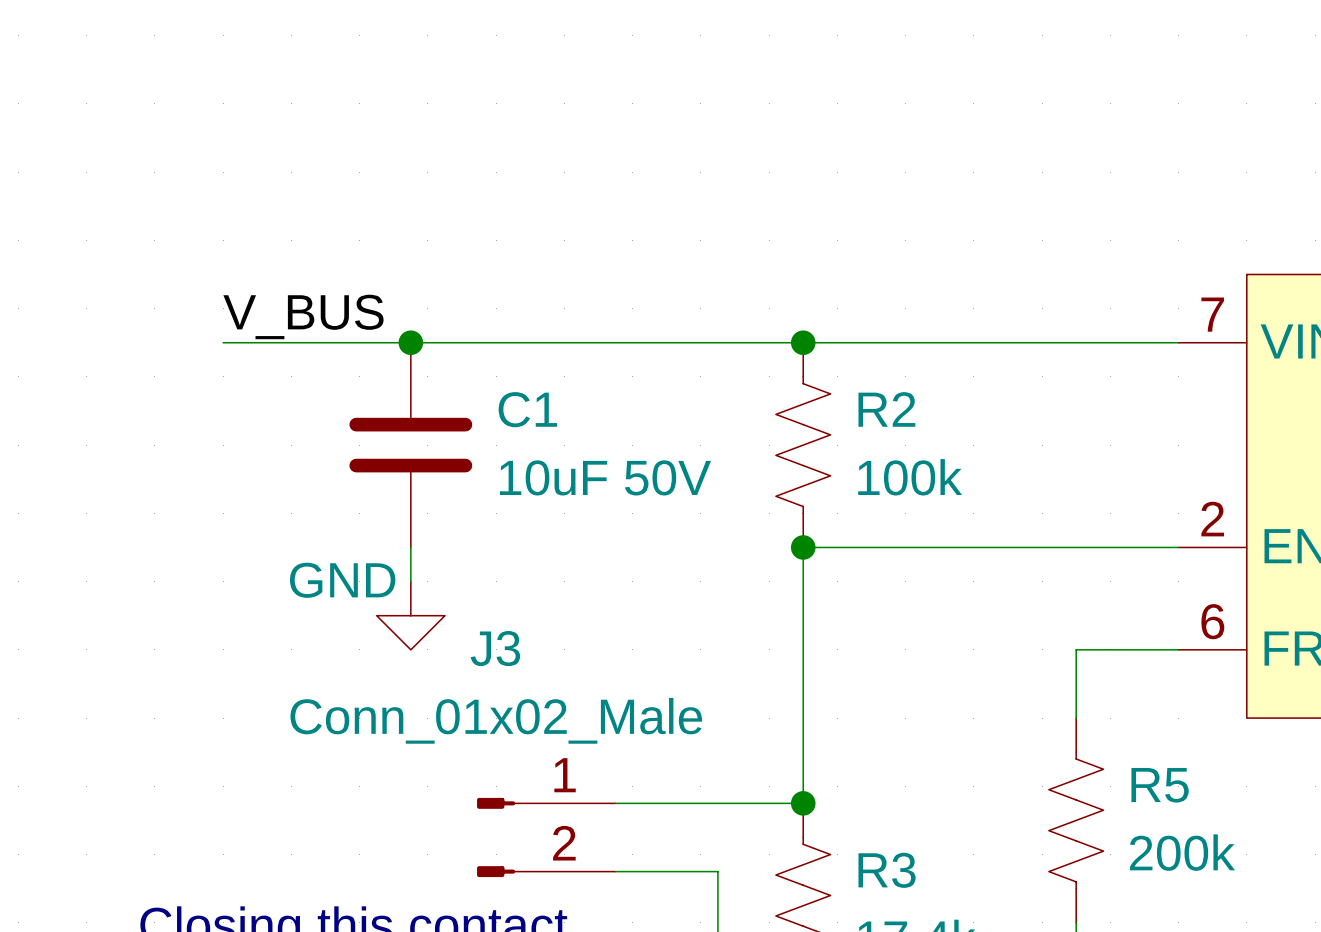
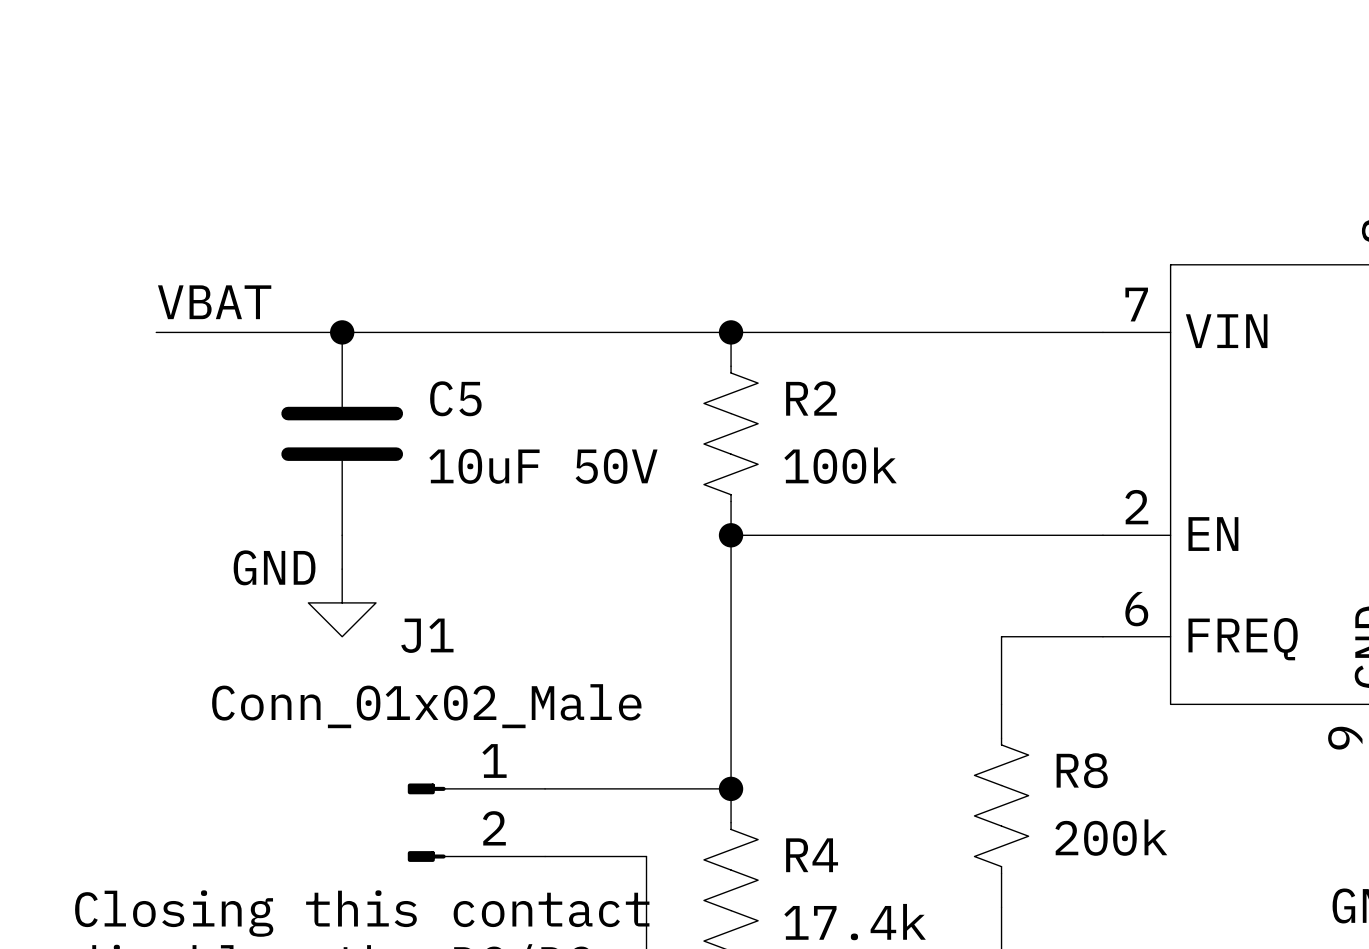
label: V_BUS (303, 316) -> VBAT (214, 302)
C1 name: C1 (527, 409) -> C5 (455, 398)
J3 name: J3 (495, 648) -> J1 (427, 635)
R5 name: R5 (1160, 785) -> R8 (1082, 770)
R3 name: R3 (887, 870) -> R4 (812, 855)

